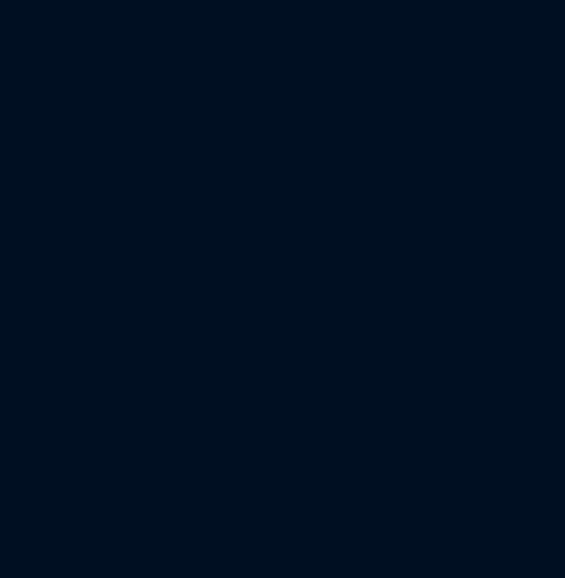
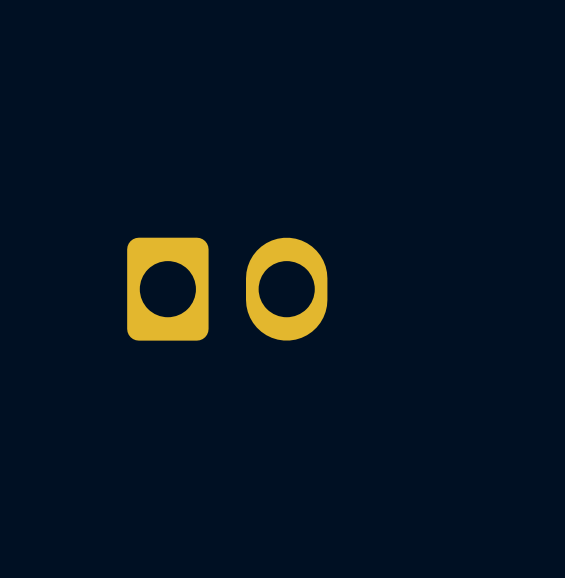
part: none -> (227, 289)

